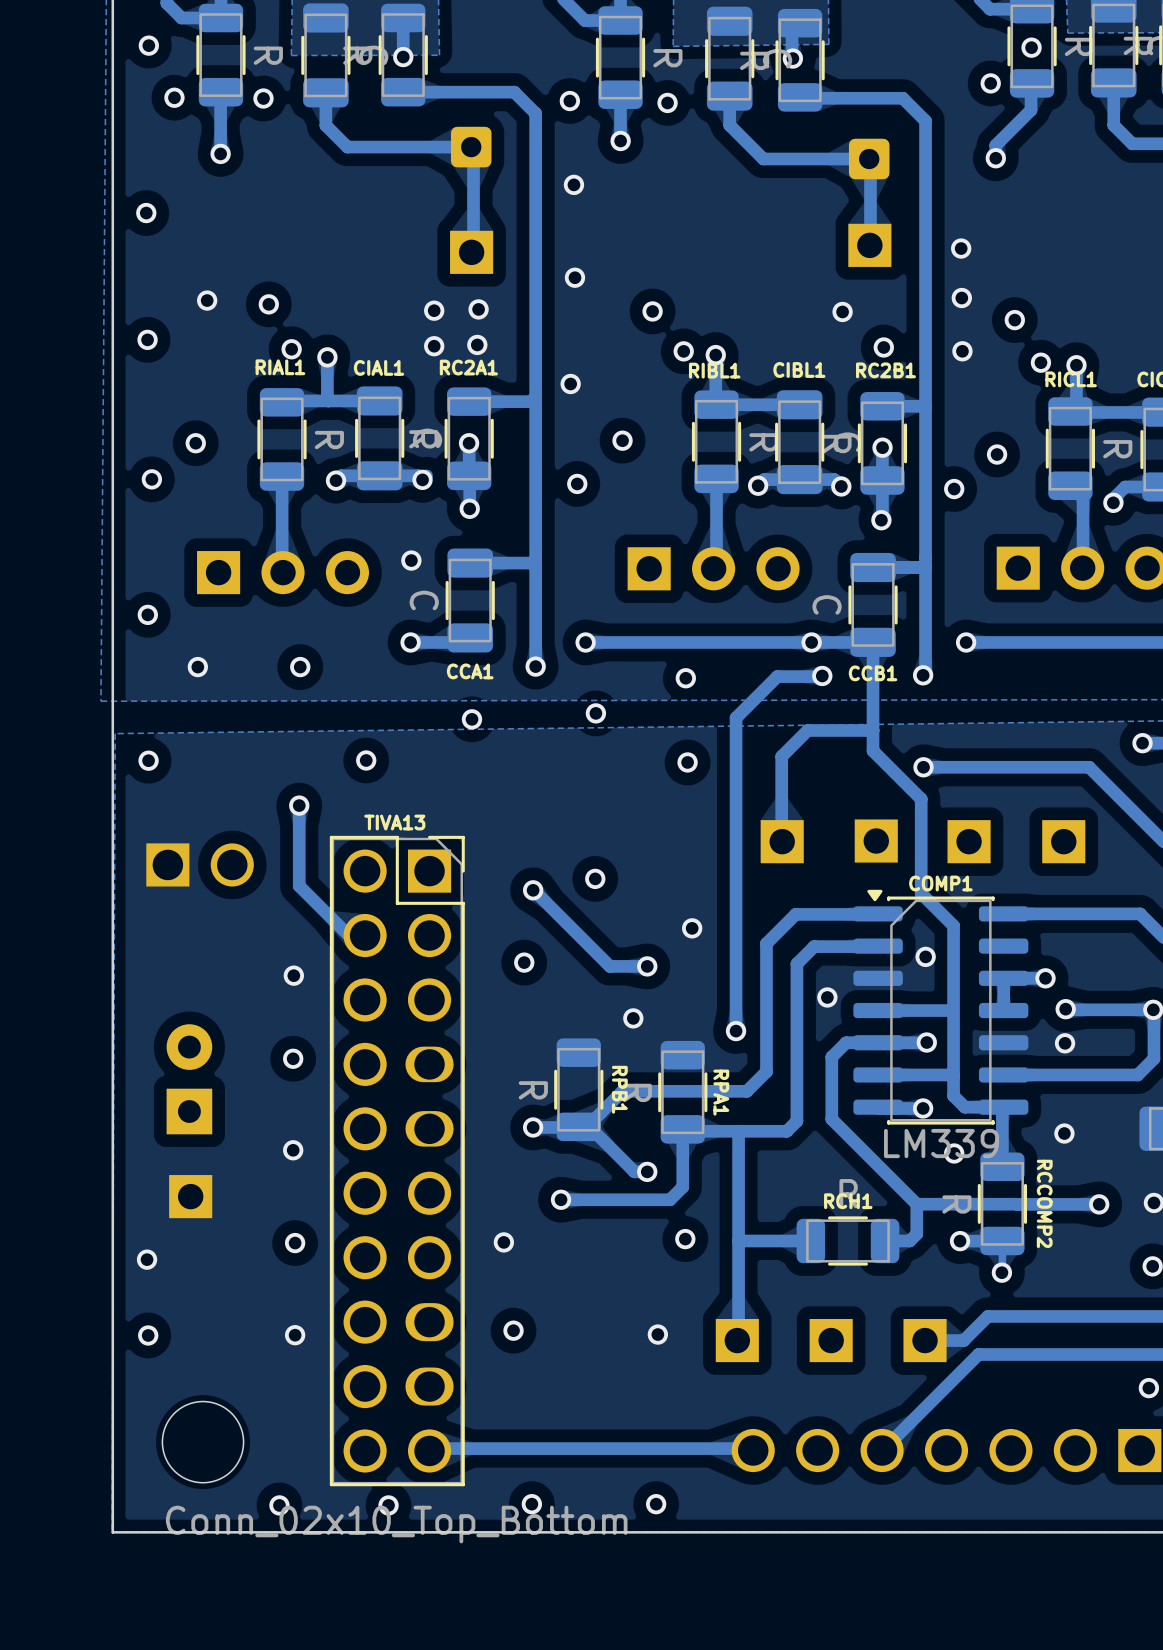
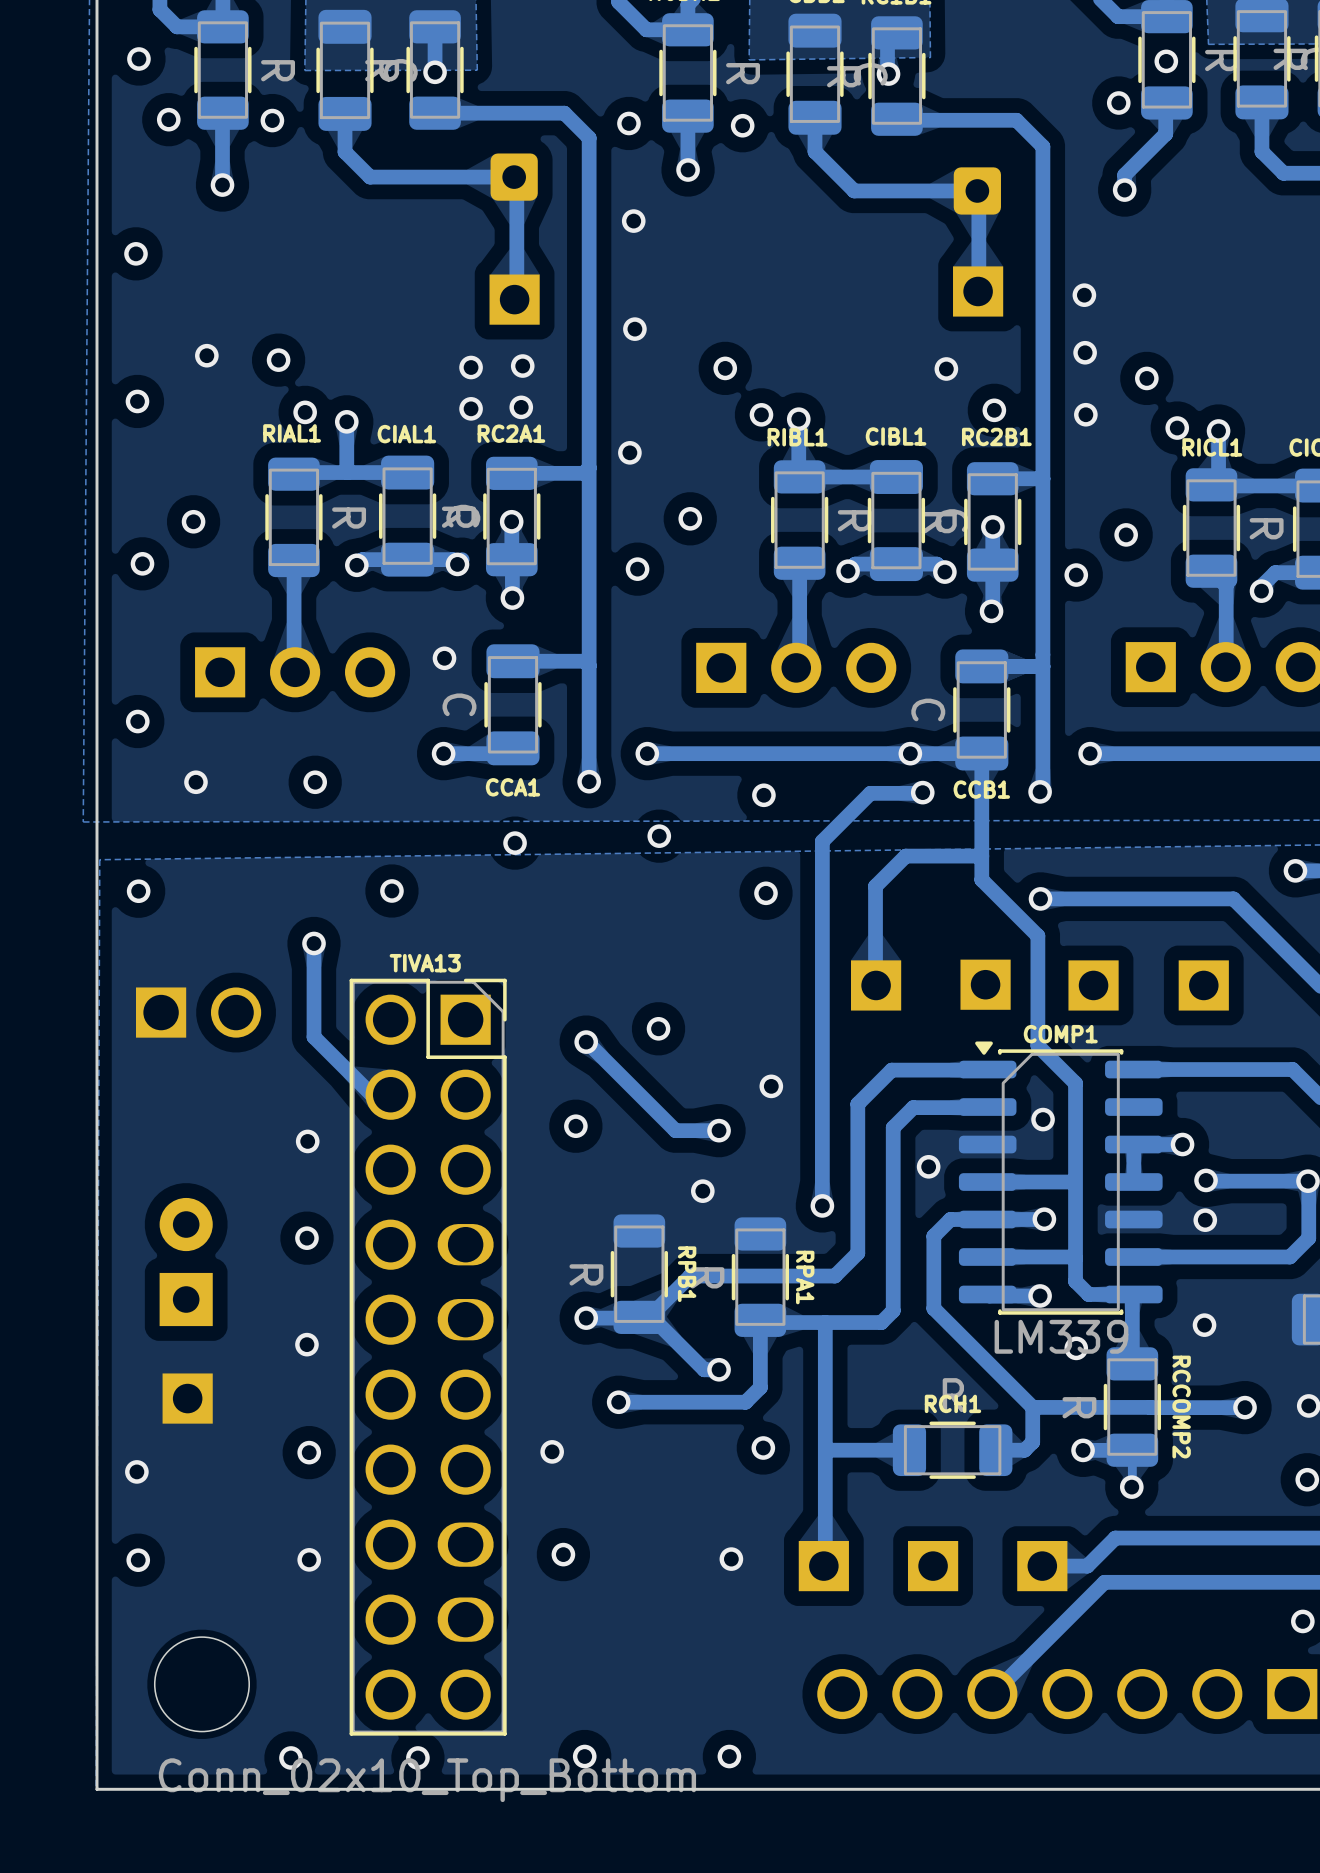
track: (427, 1445) (430, 1448) (746, 1448) (752, 1455) -> none

